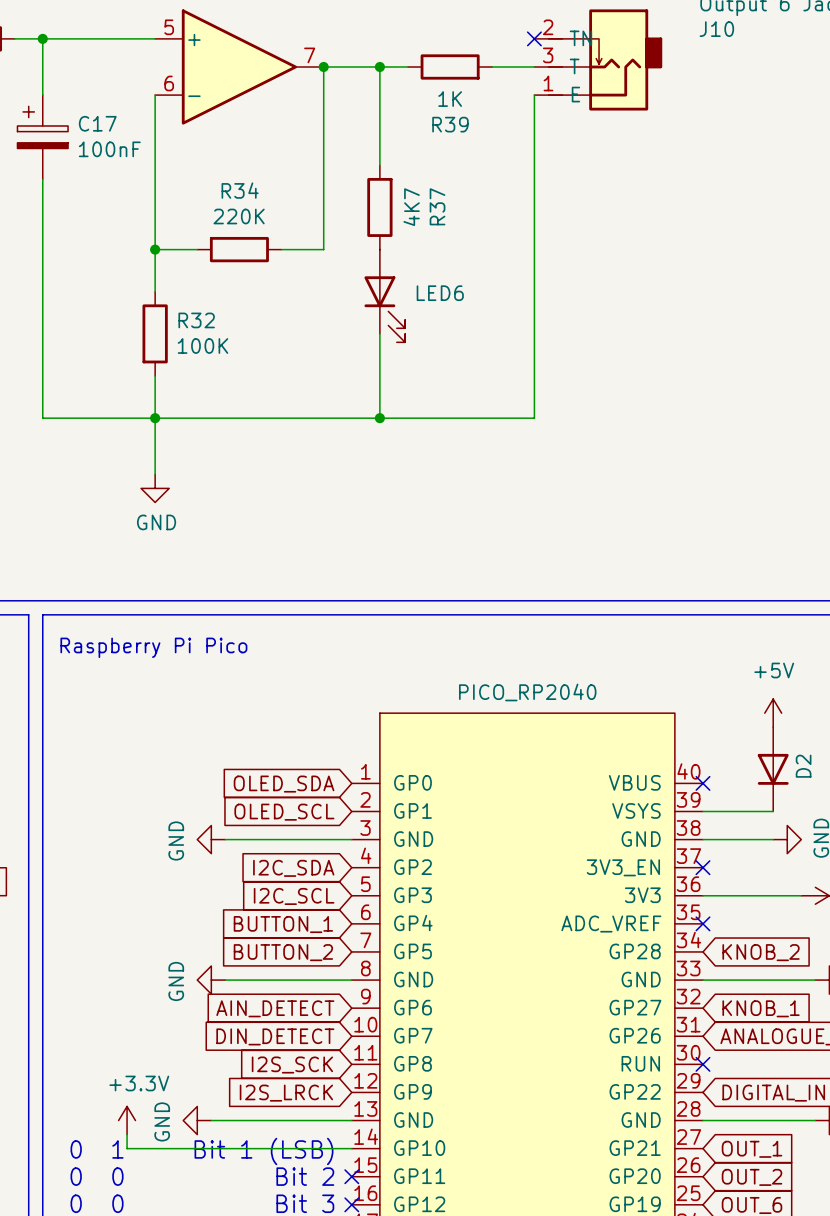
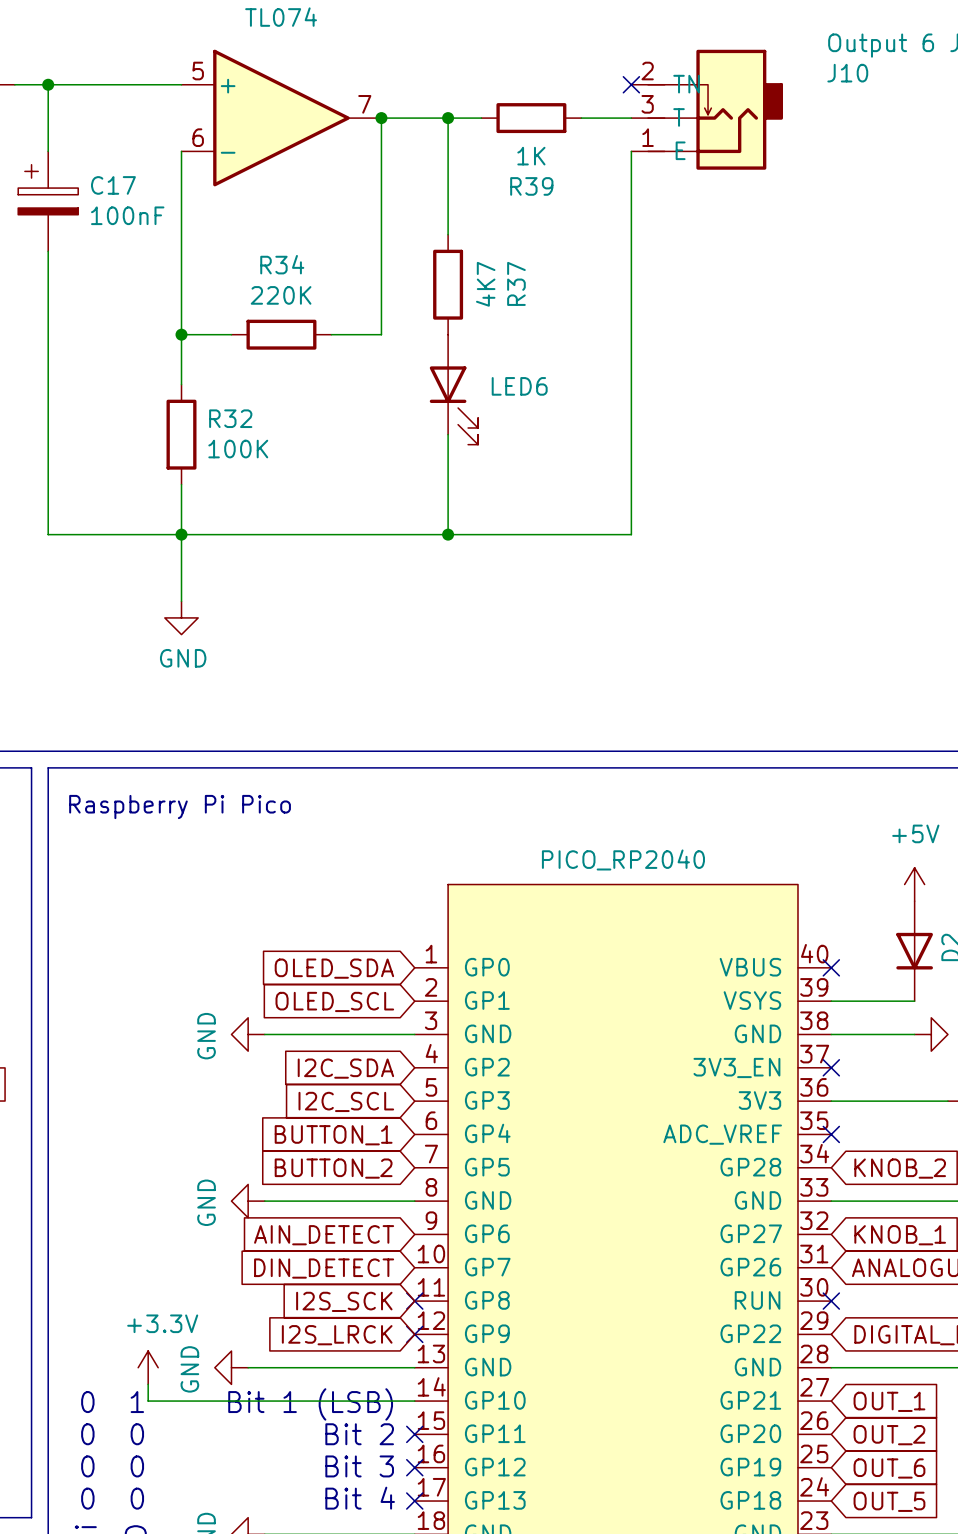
no-connect mark: none -> (414, 1301)
no-connect mark: none -> (414, 1334)

